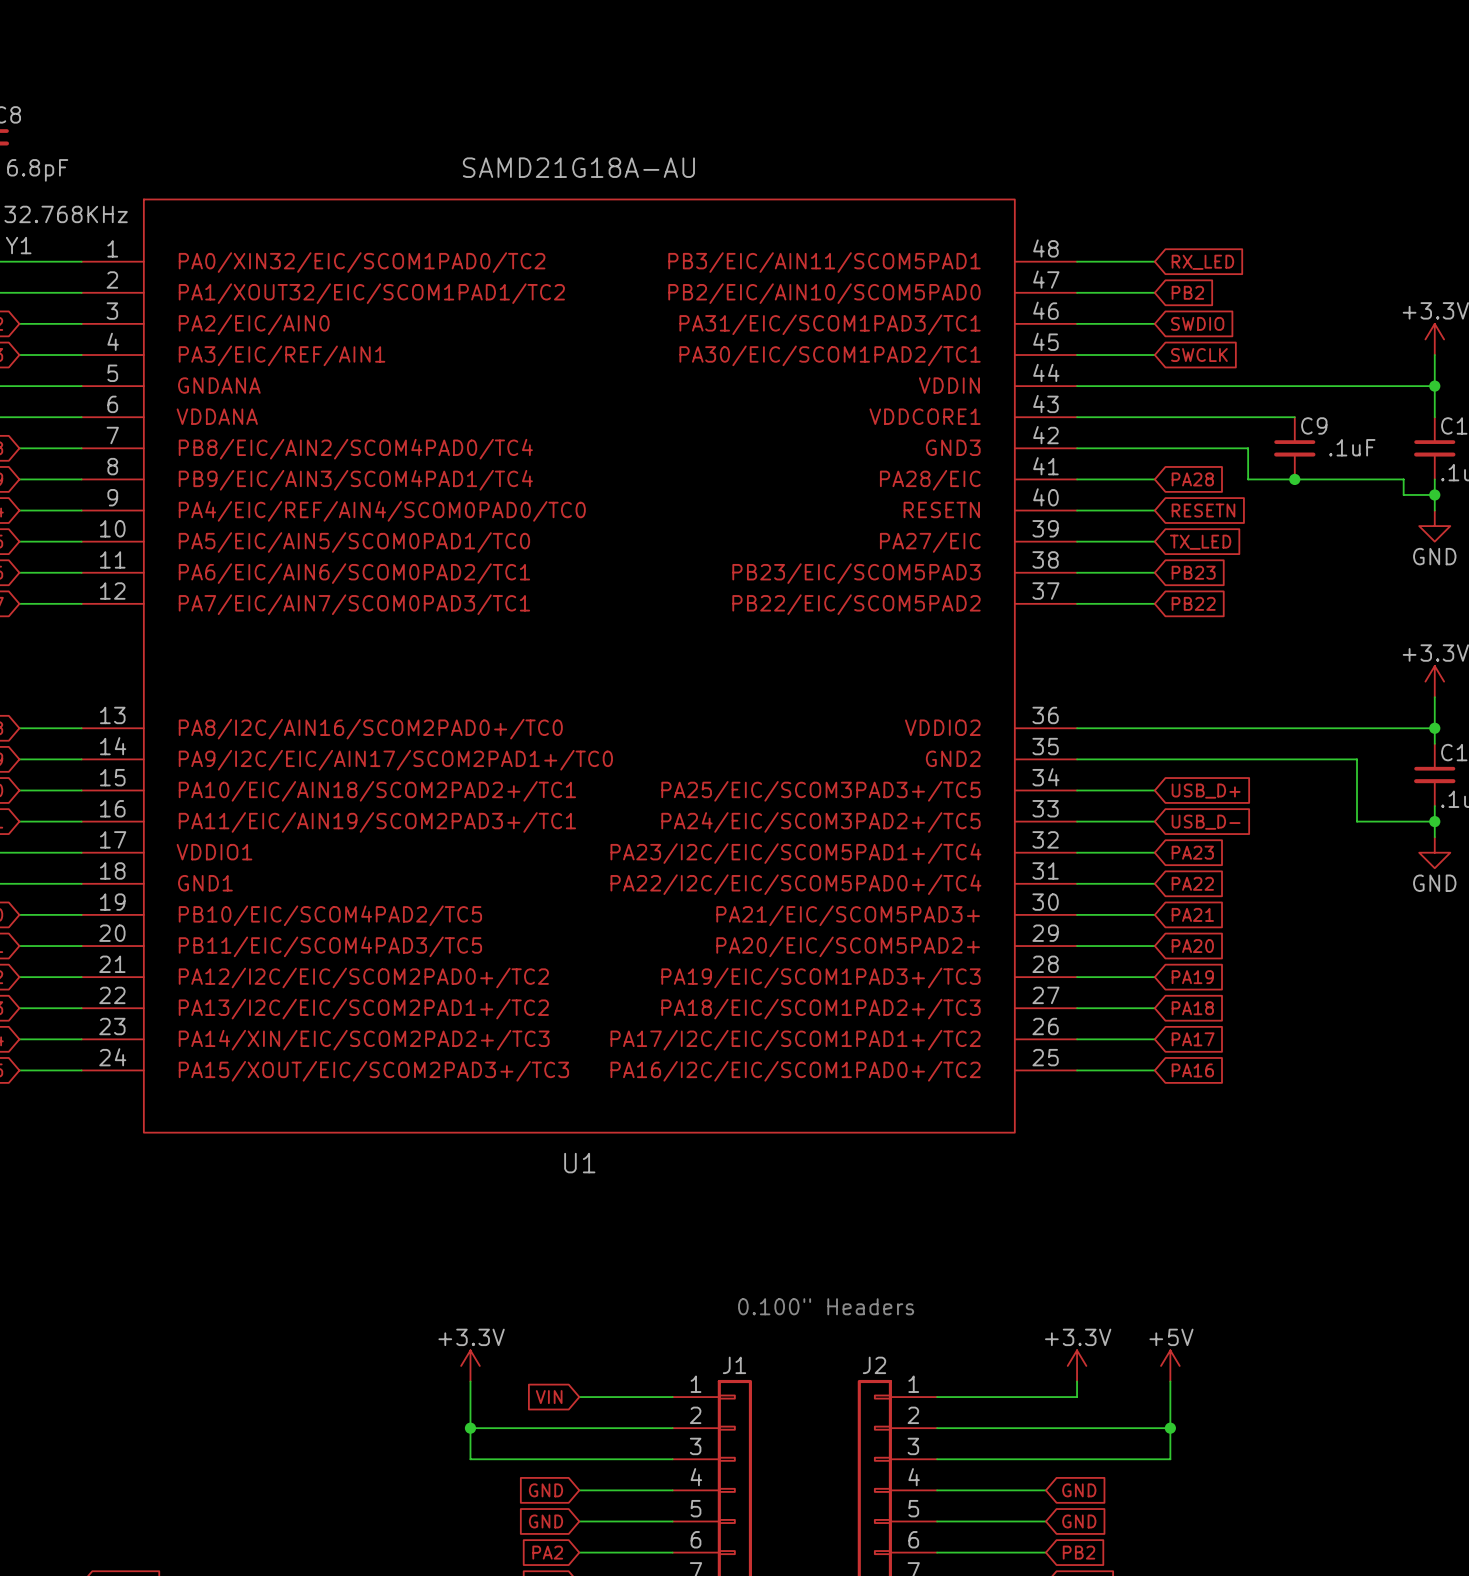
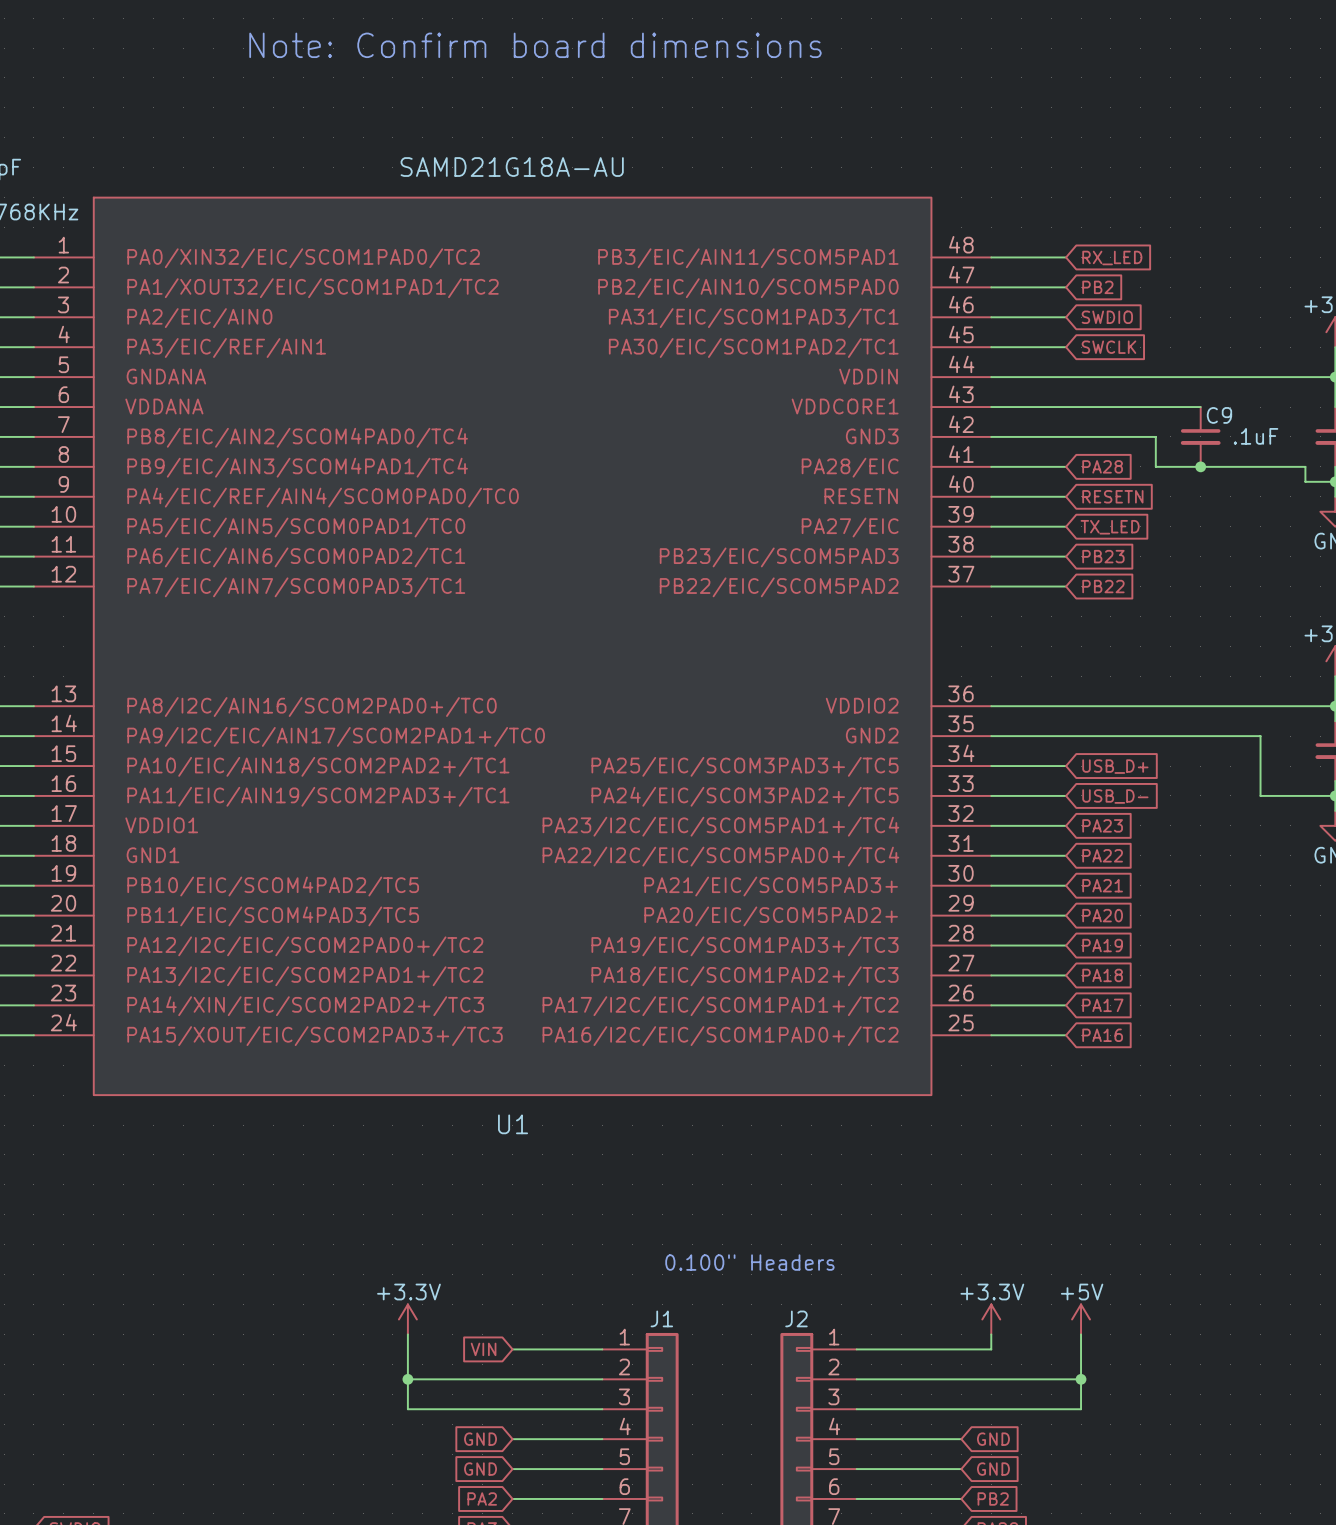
text: none -> Note: Confirm board dimensions (535, 45)

